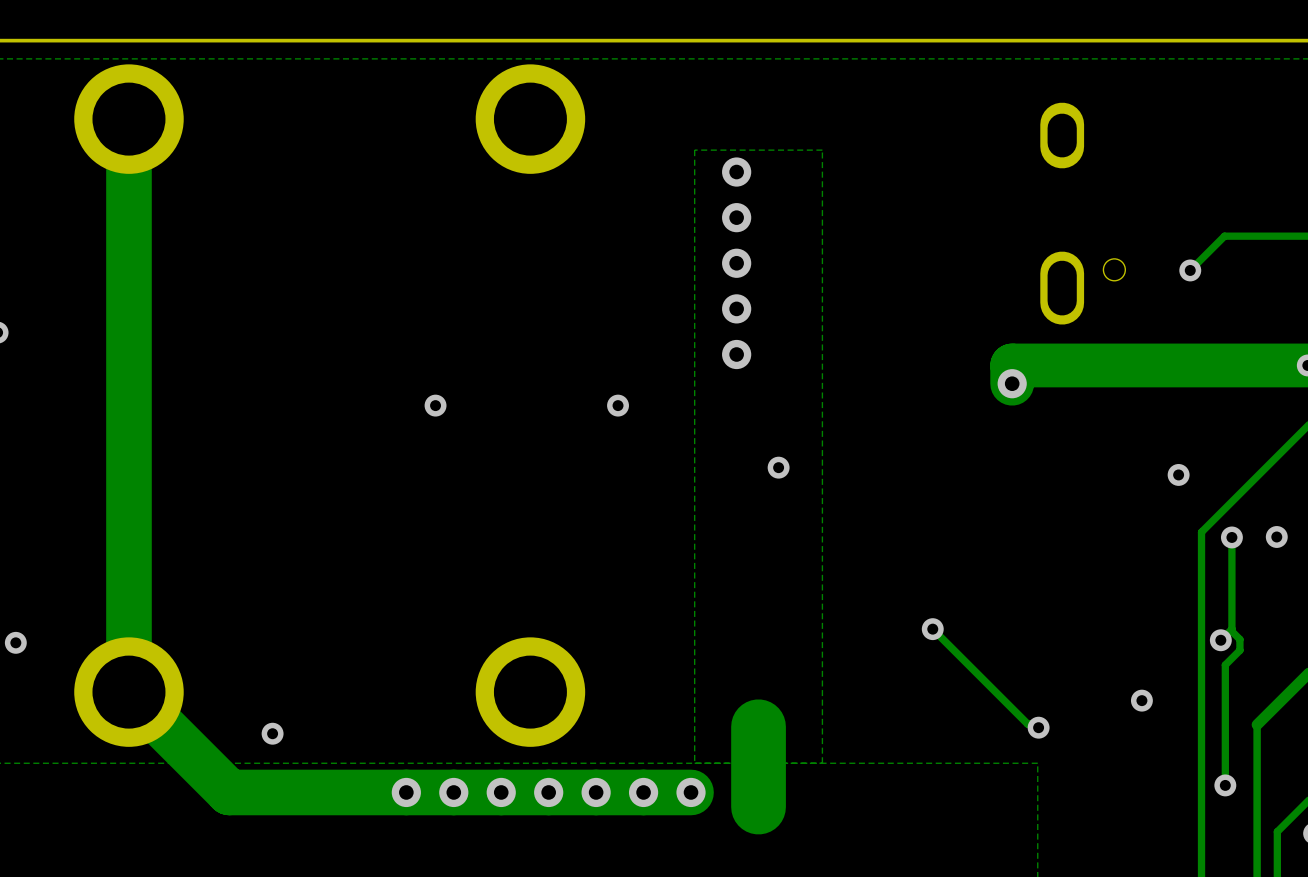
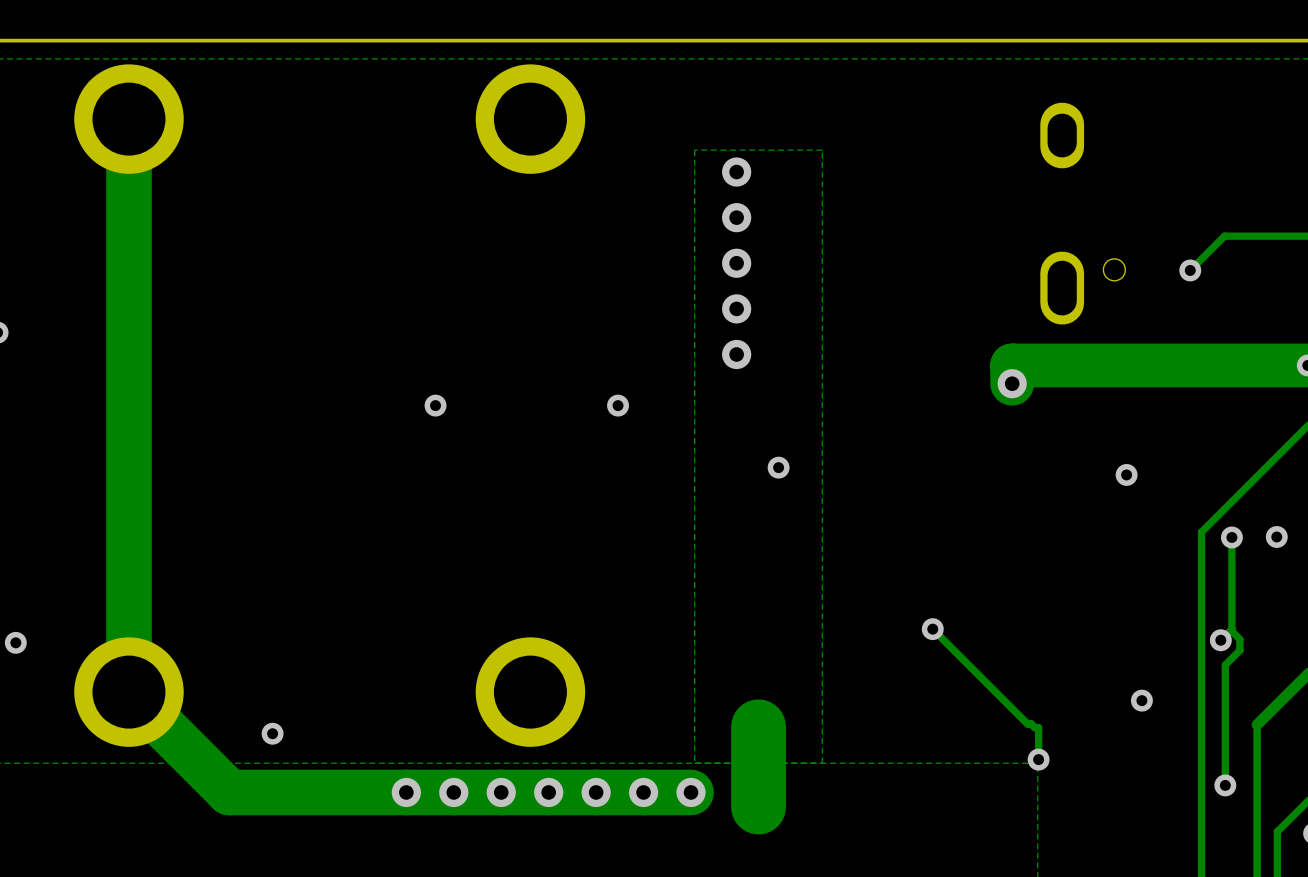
via position: (1178, 474) -> (1126, 474)
track: none -> (1038, 727) (1038, 759)
via position: (1038, 727) -> (1038, 759)

